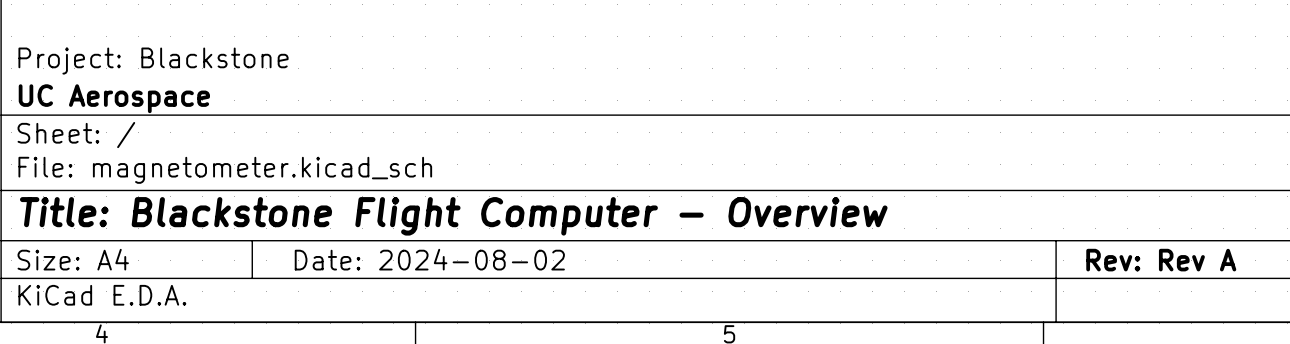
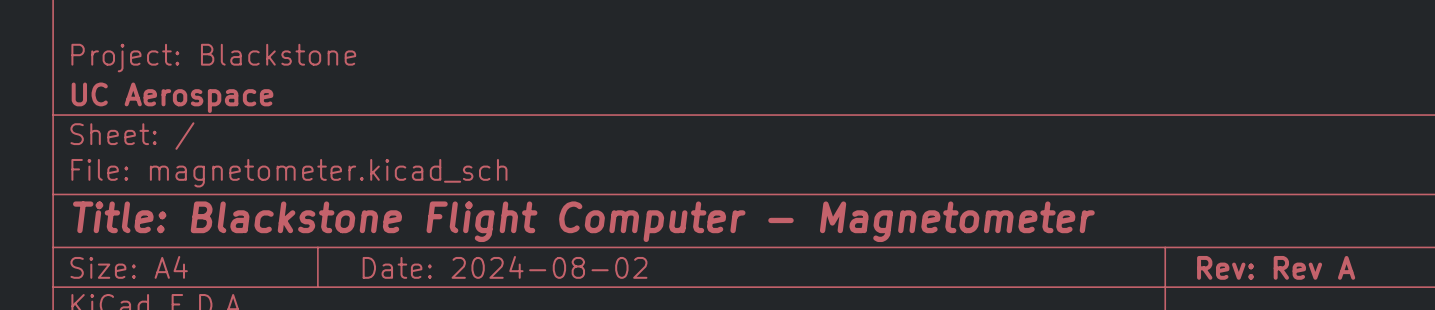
title block: Title: Blackstone Flight Computer - Overview (453, 216) -> Title: Blackstone Flight Computer - Magnetometer (583, 221)

